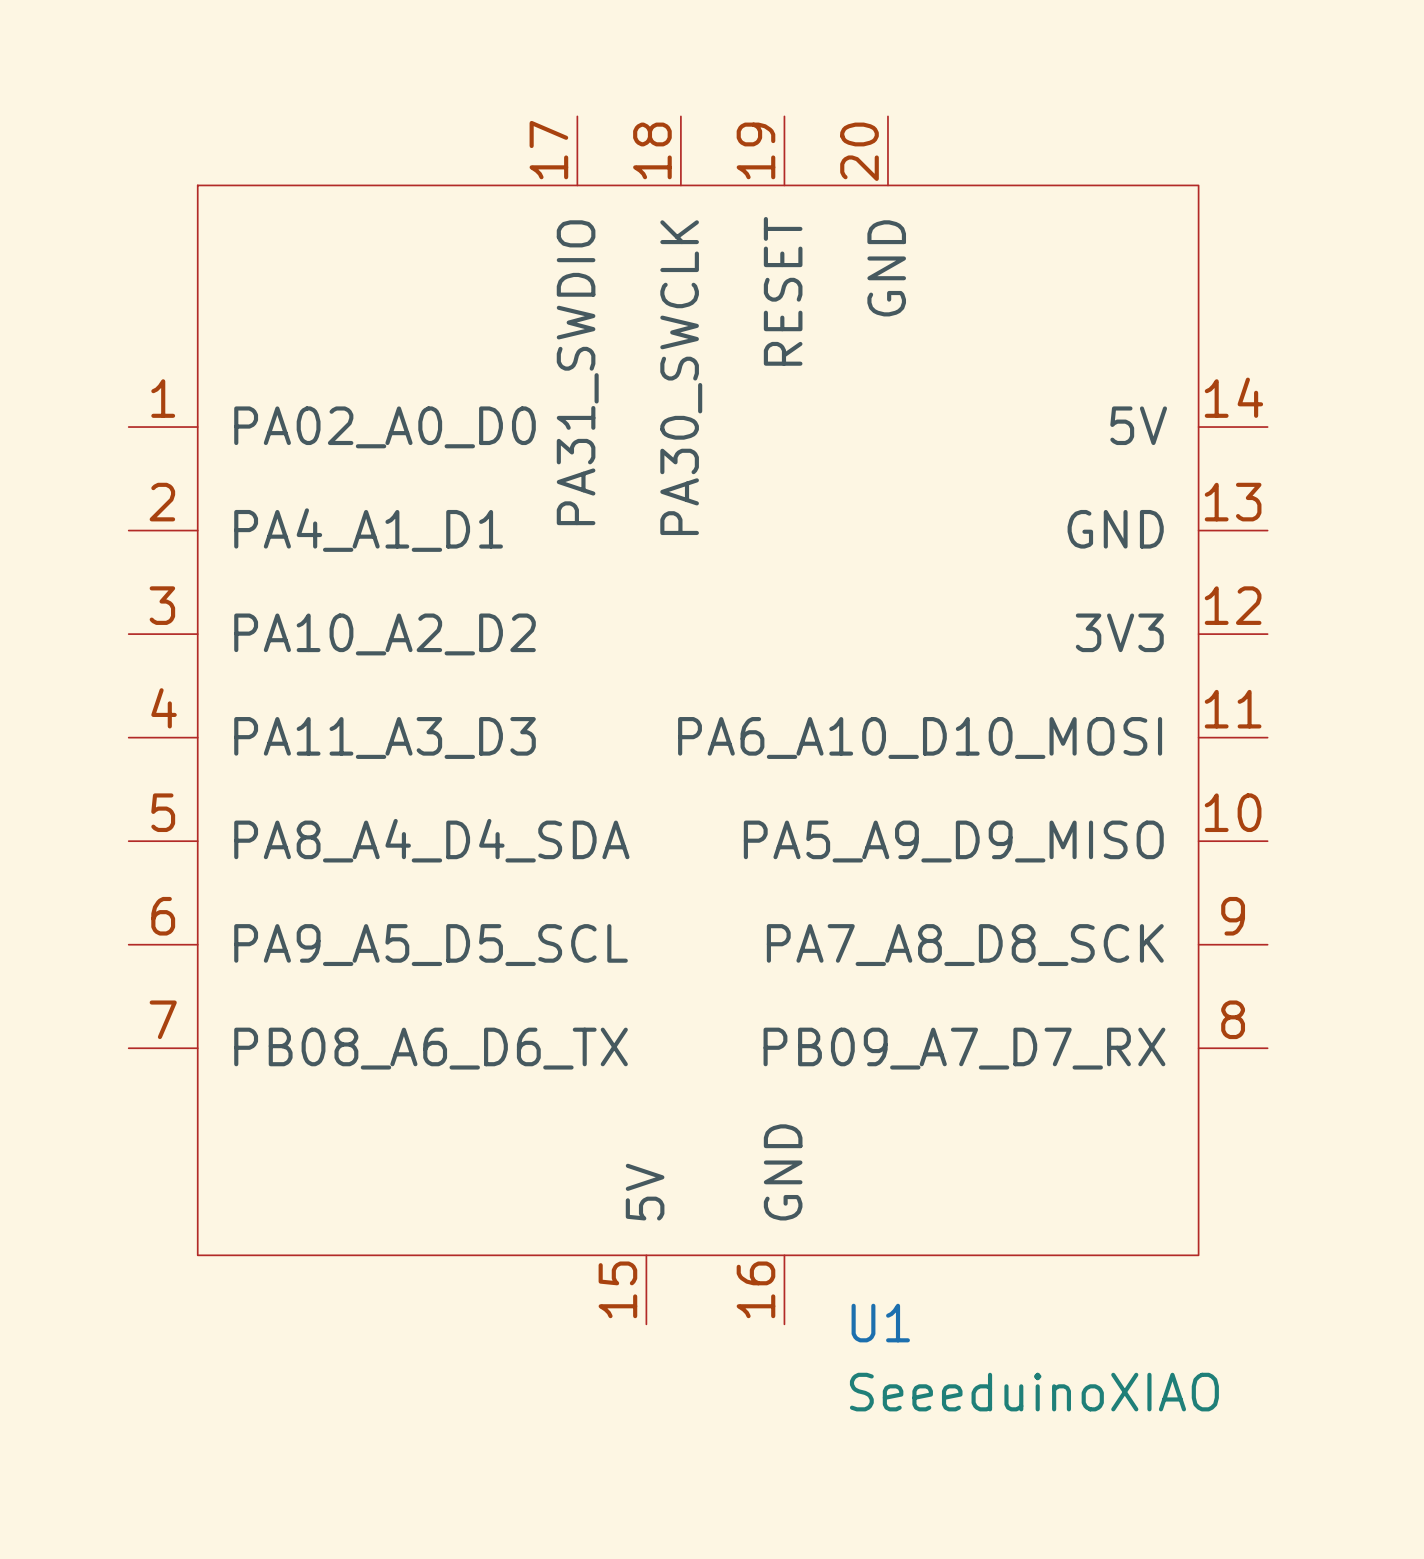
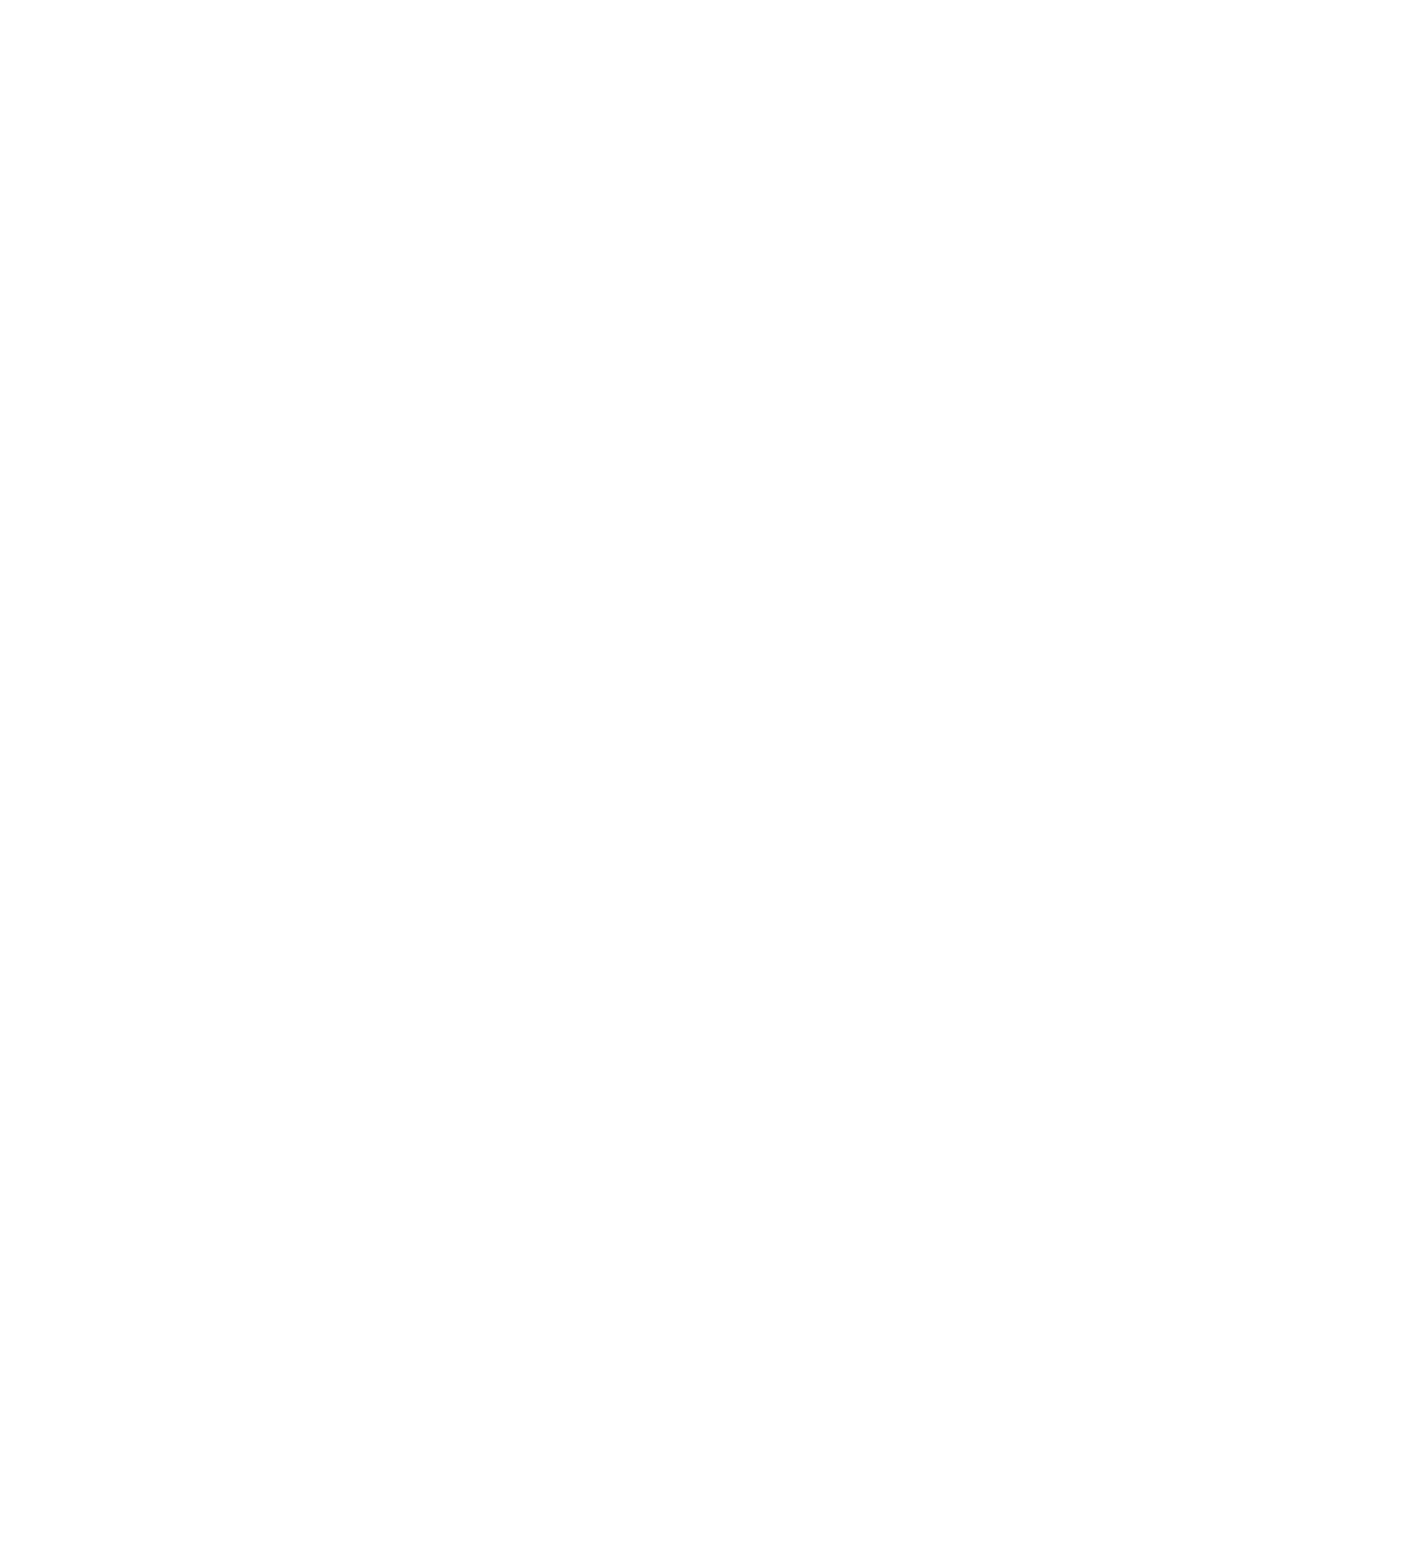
U1: SeeeduinoXIAO (698, 720) -> none

